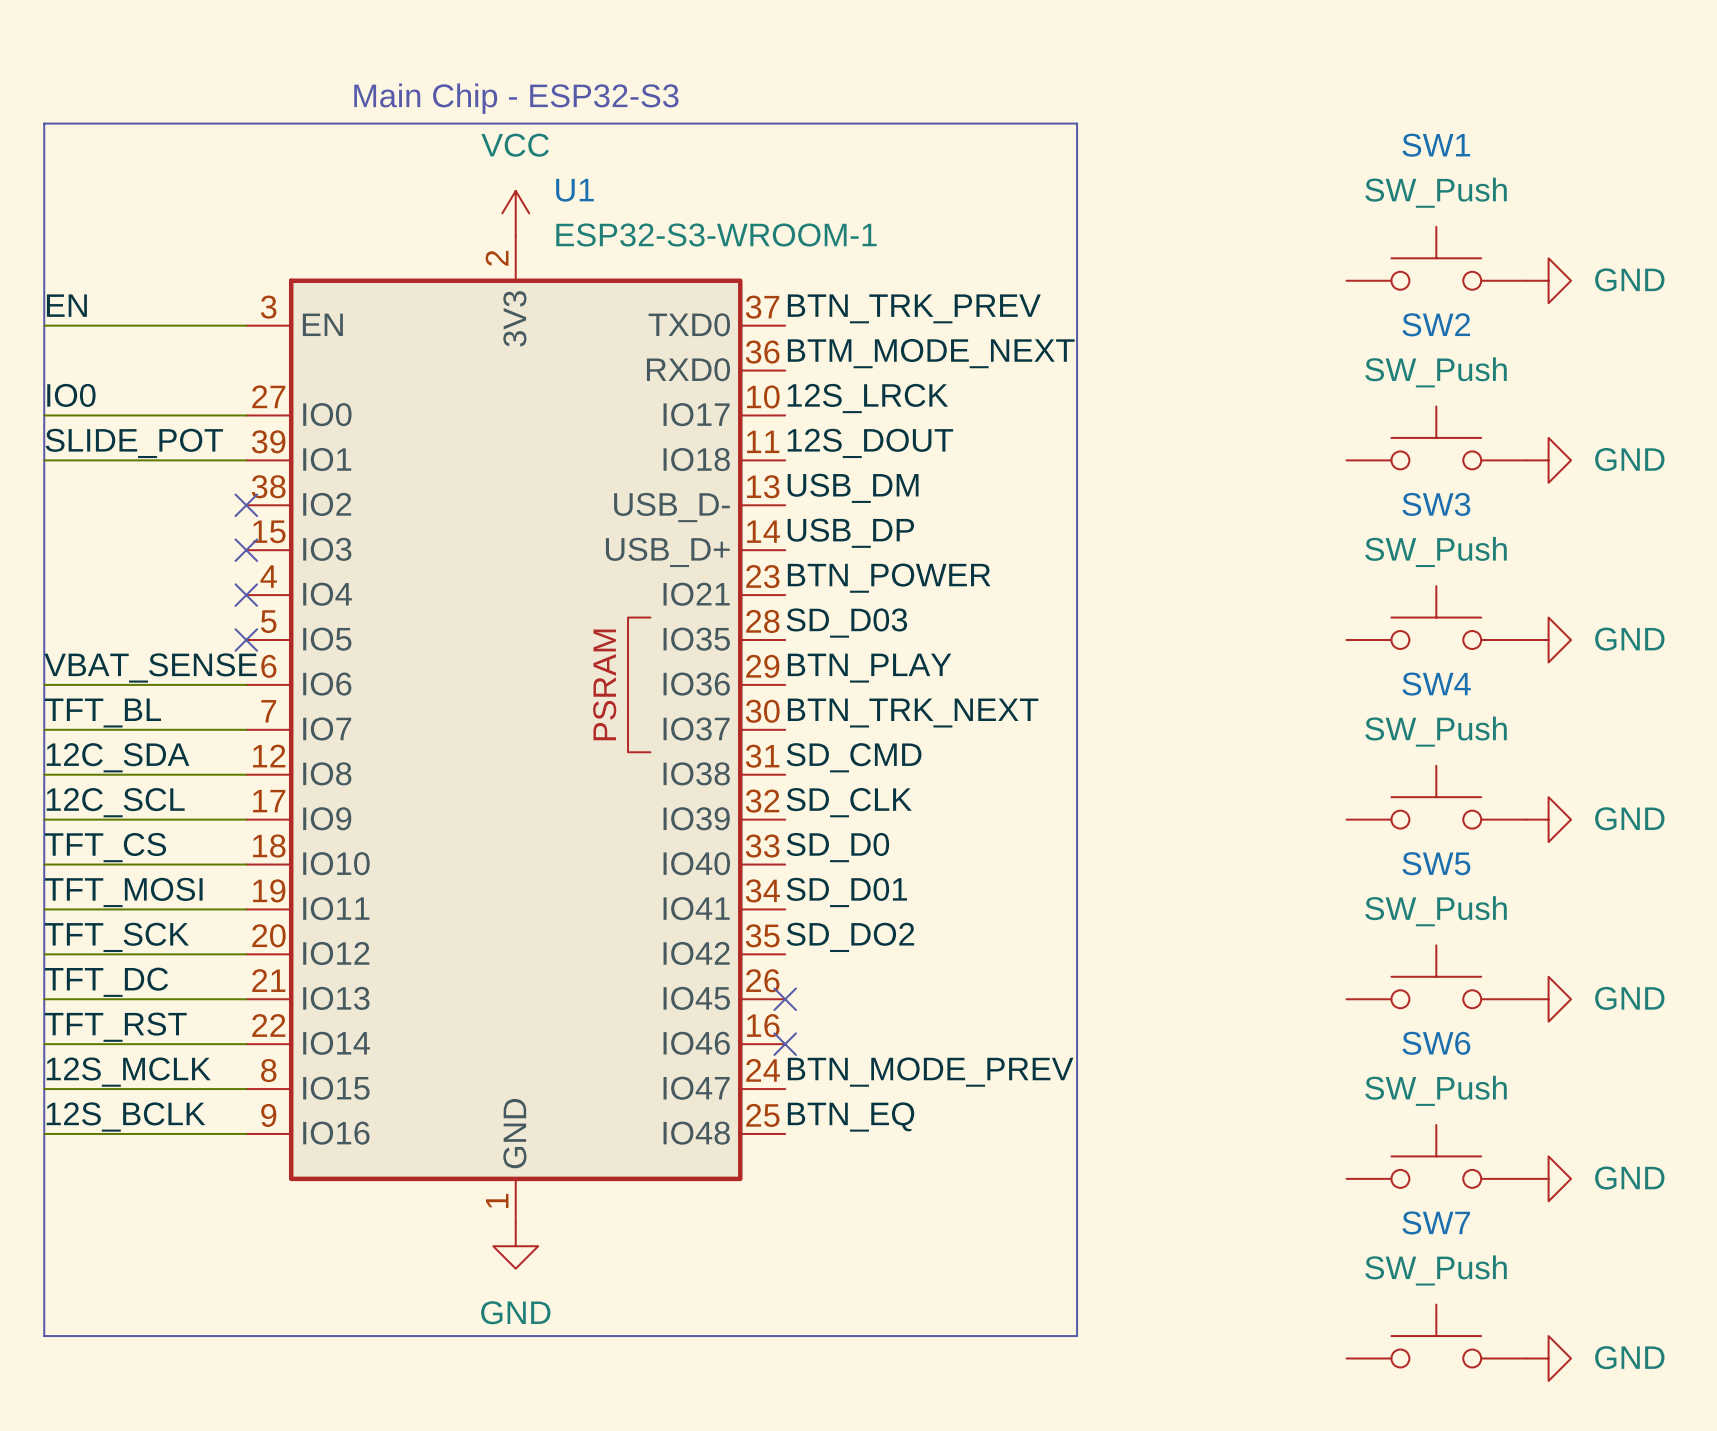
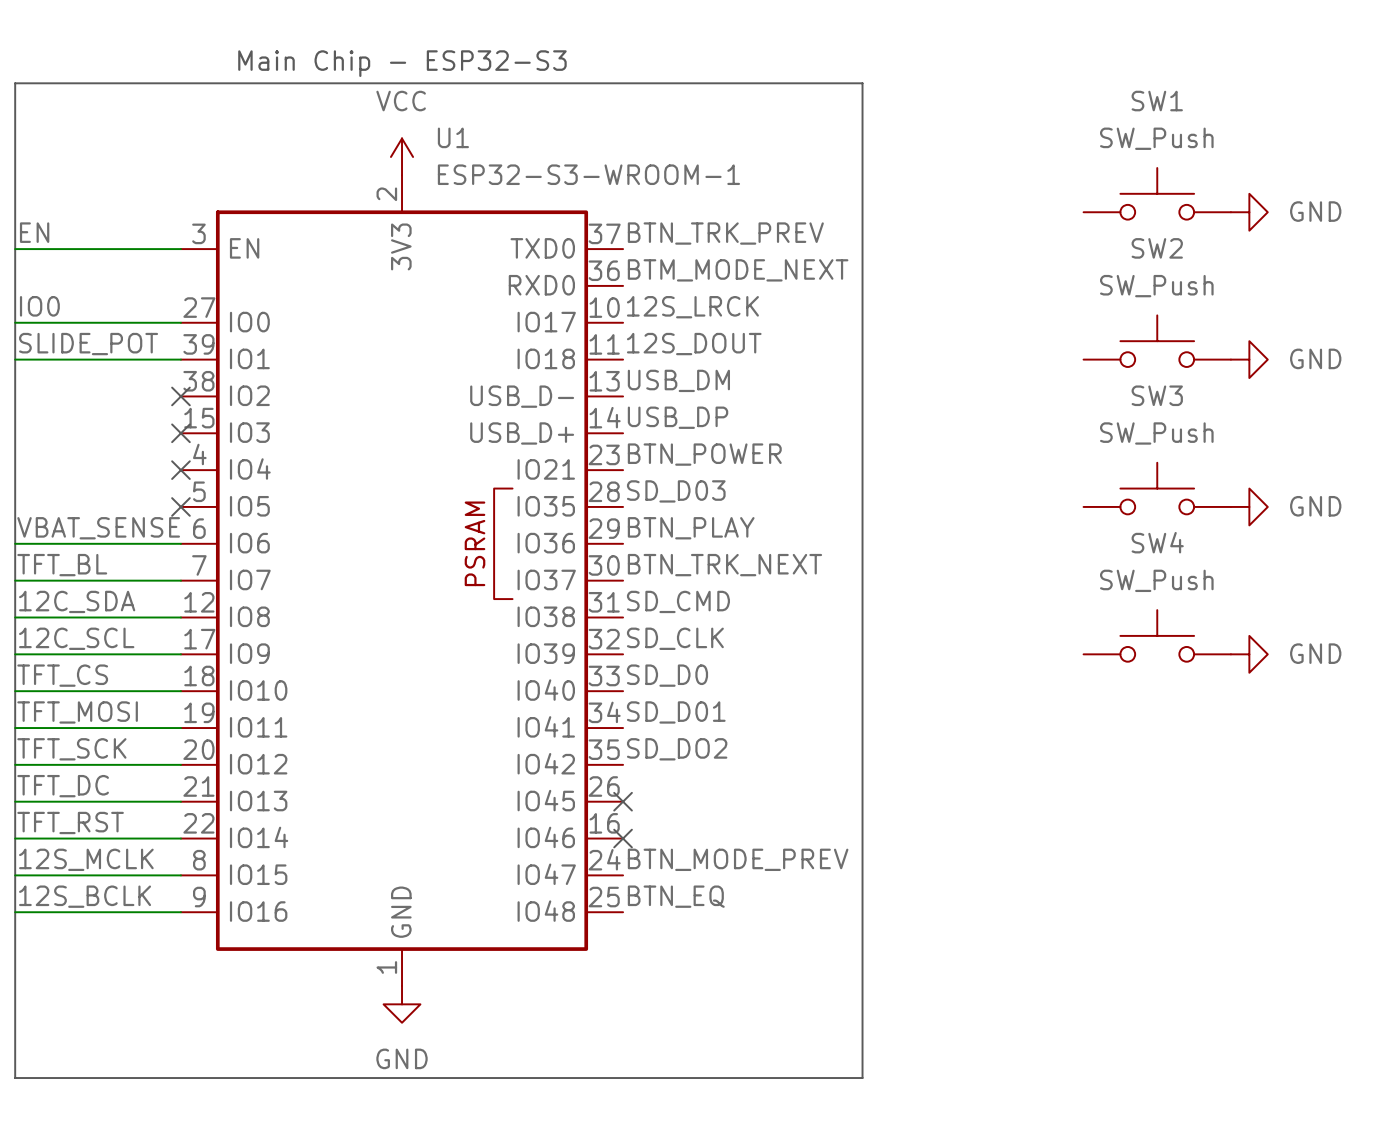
SW5: SW_Push (1436, 976) -> none
power symbol: GND (1548, 999) -> none
SW6: SW_Push (1436, 1156) -> none
power symbol: GND (1548, 1178) -> none
SW7: SW_Push (1436, 1336) -> none
power symbol: GND (1548, 1358) -> none

